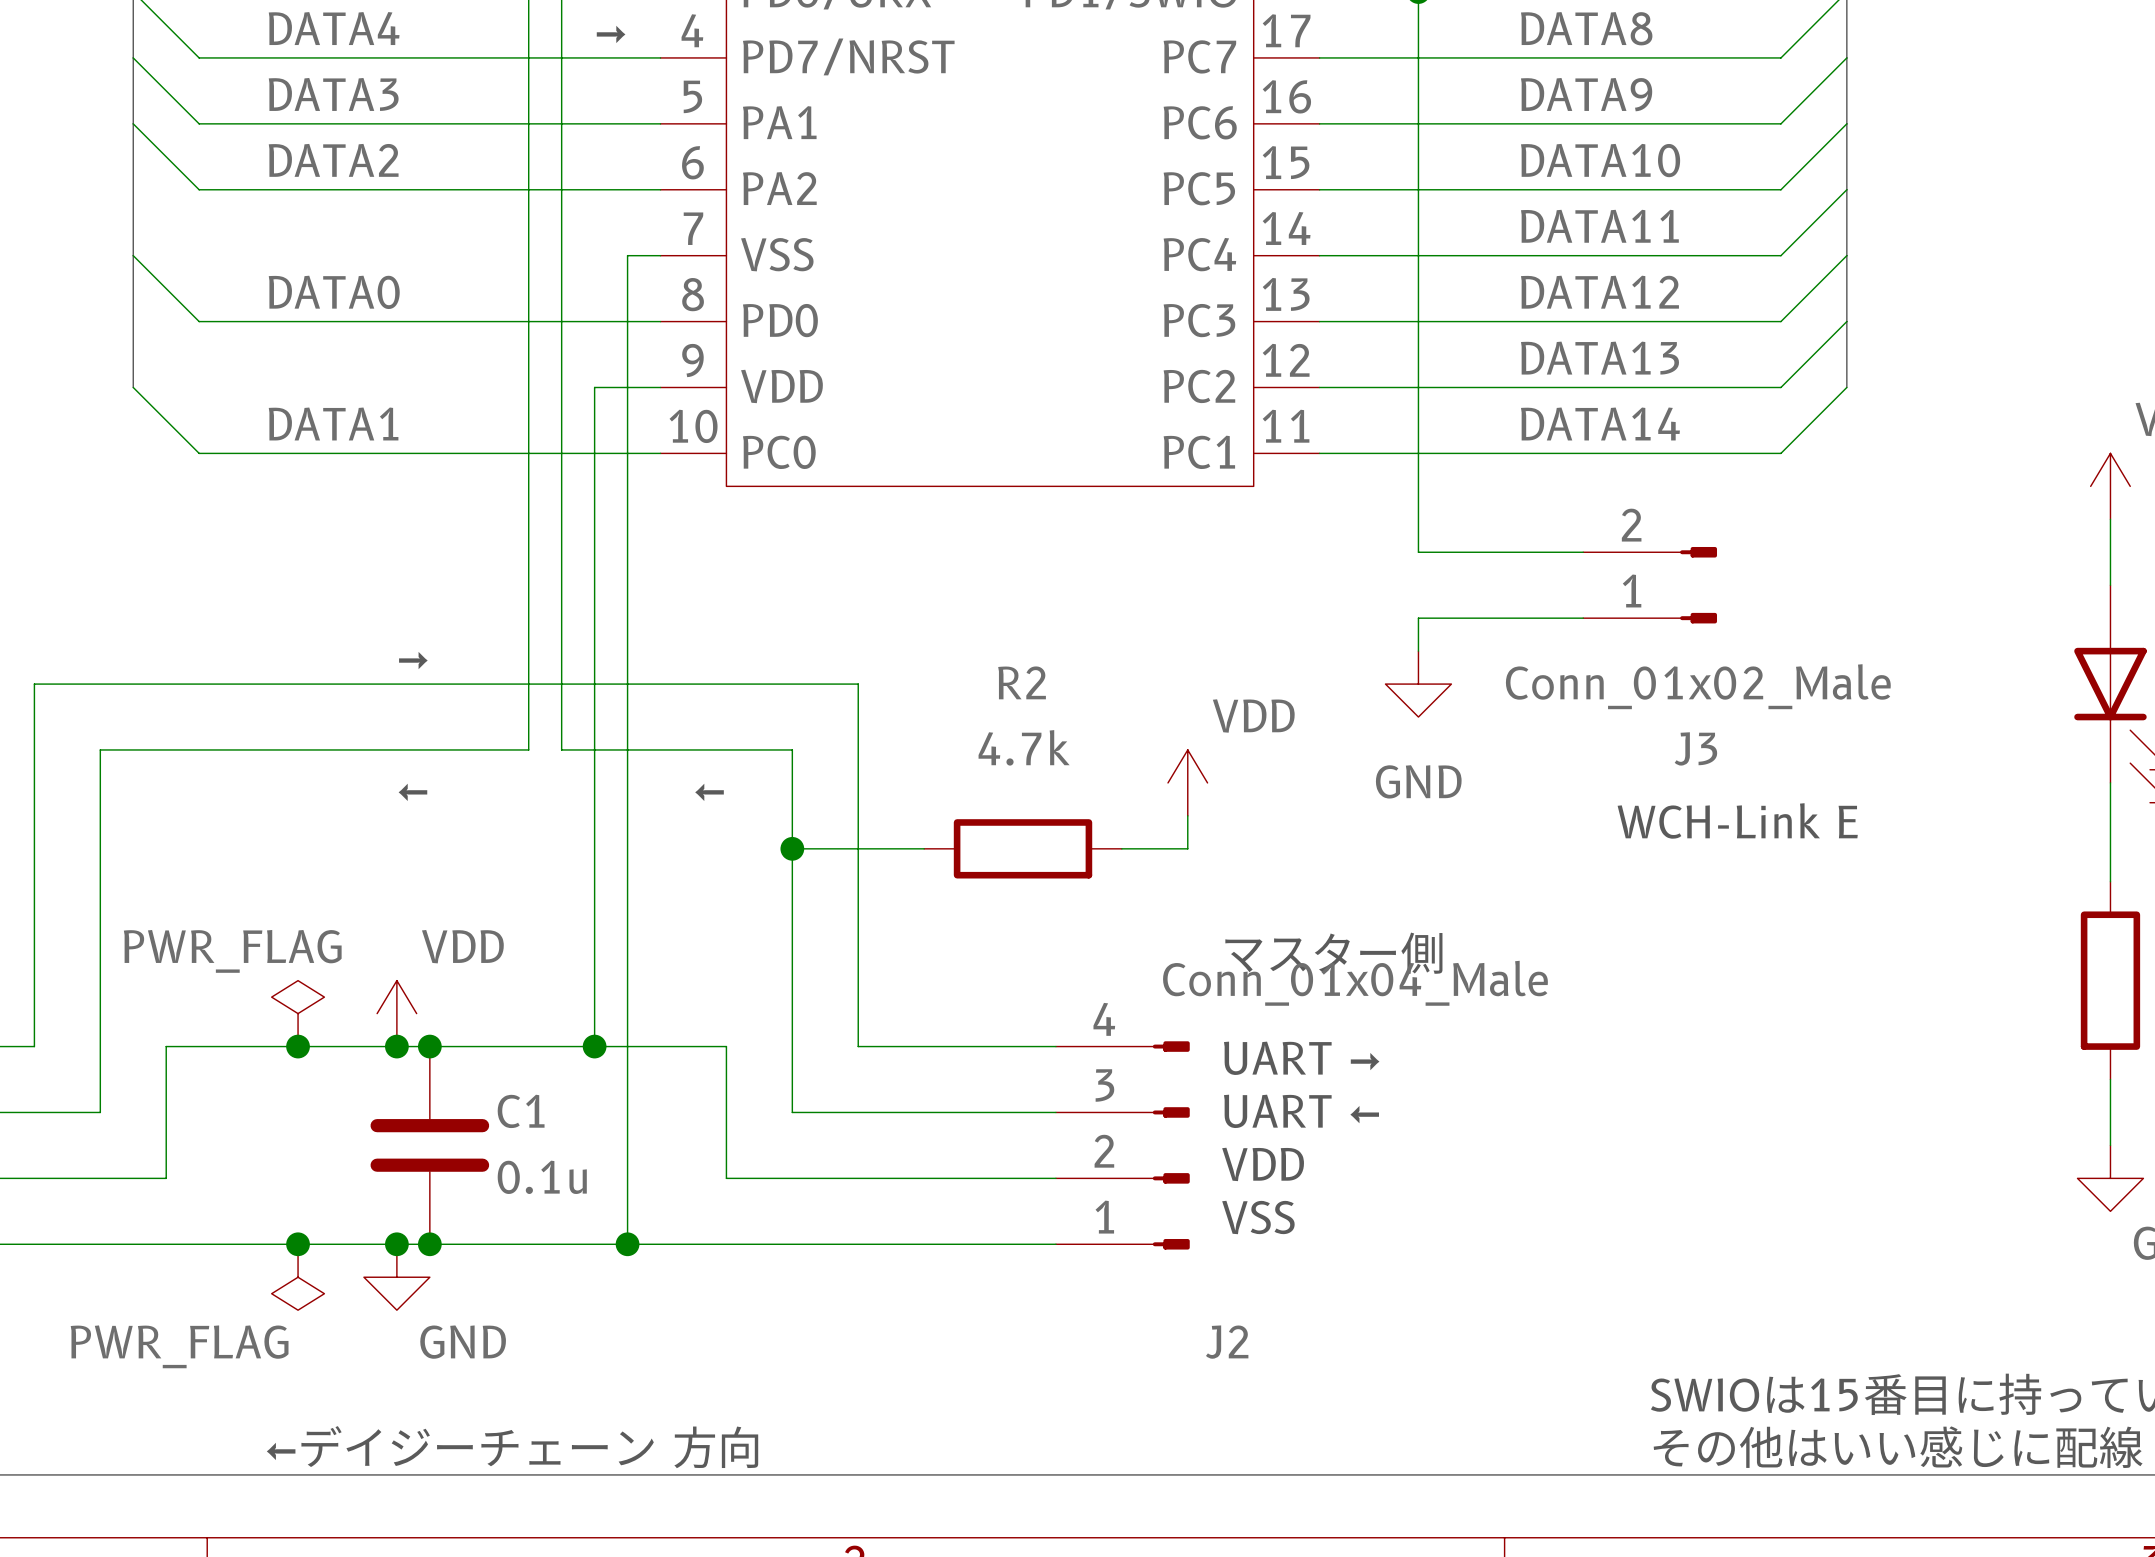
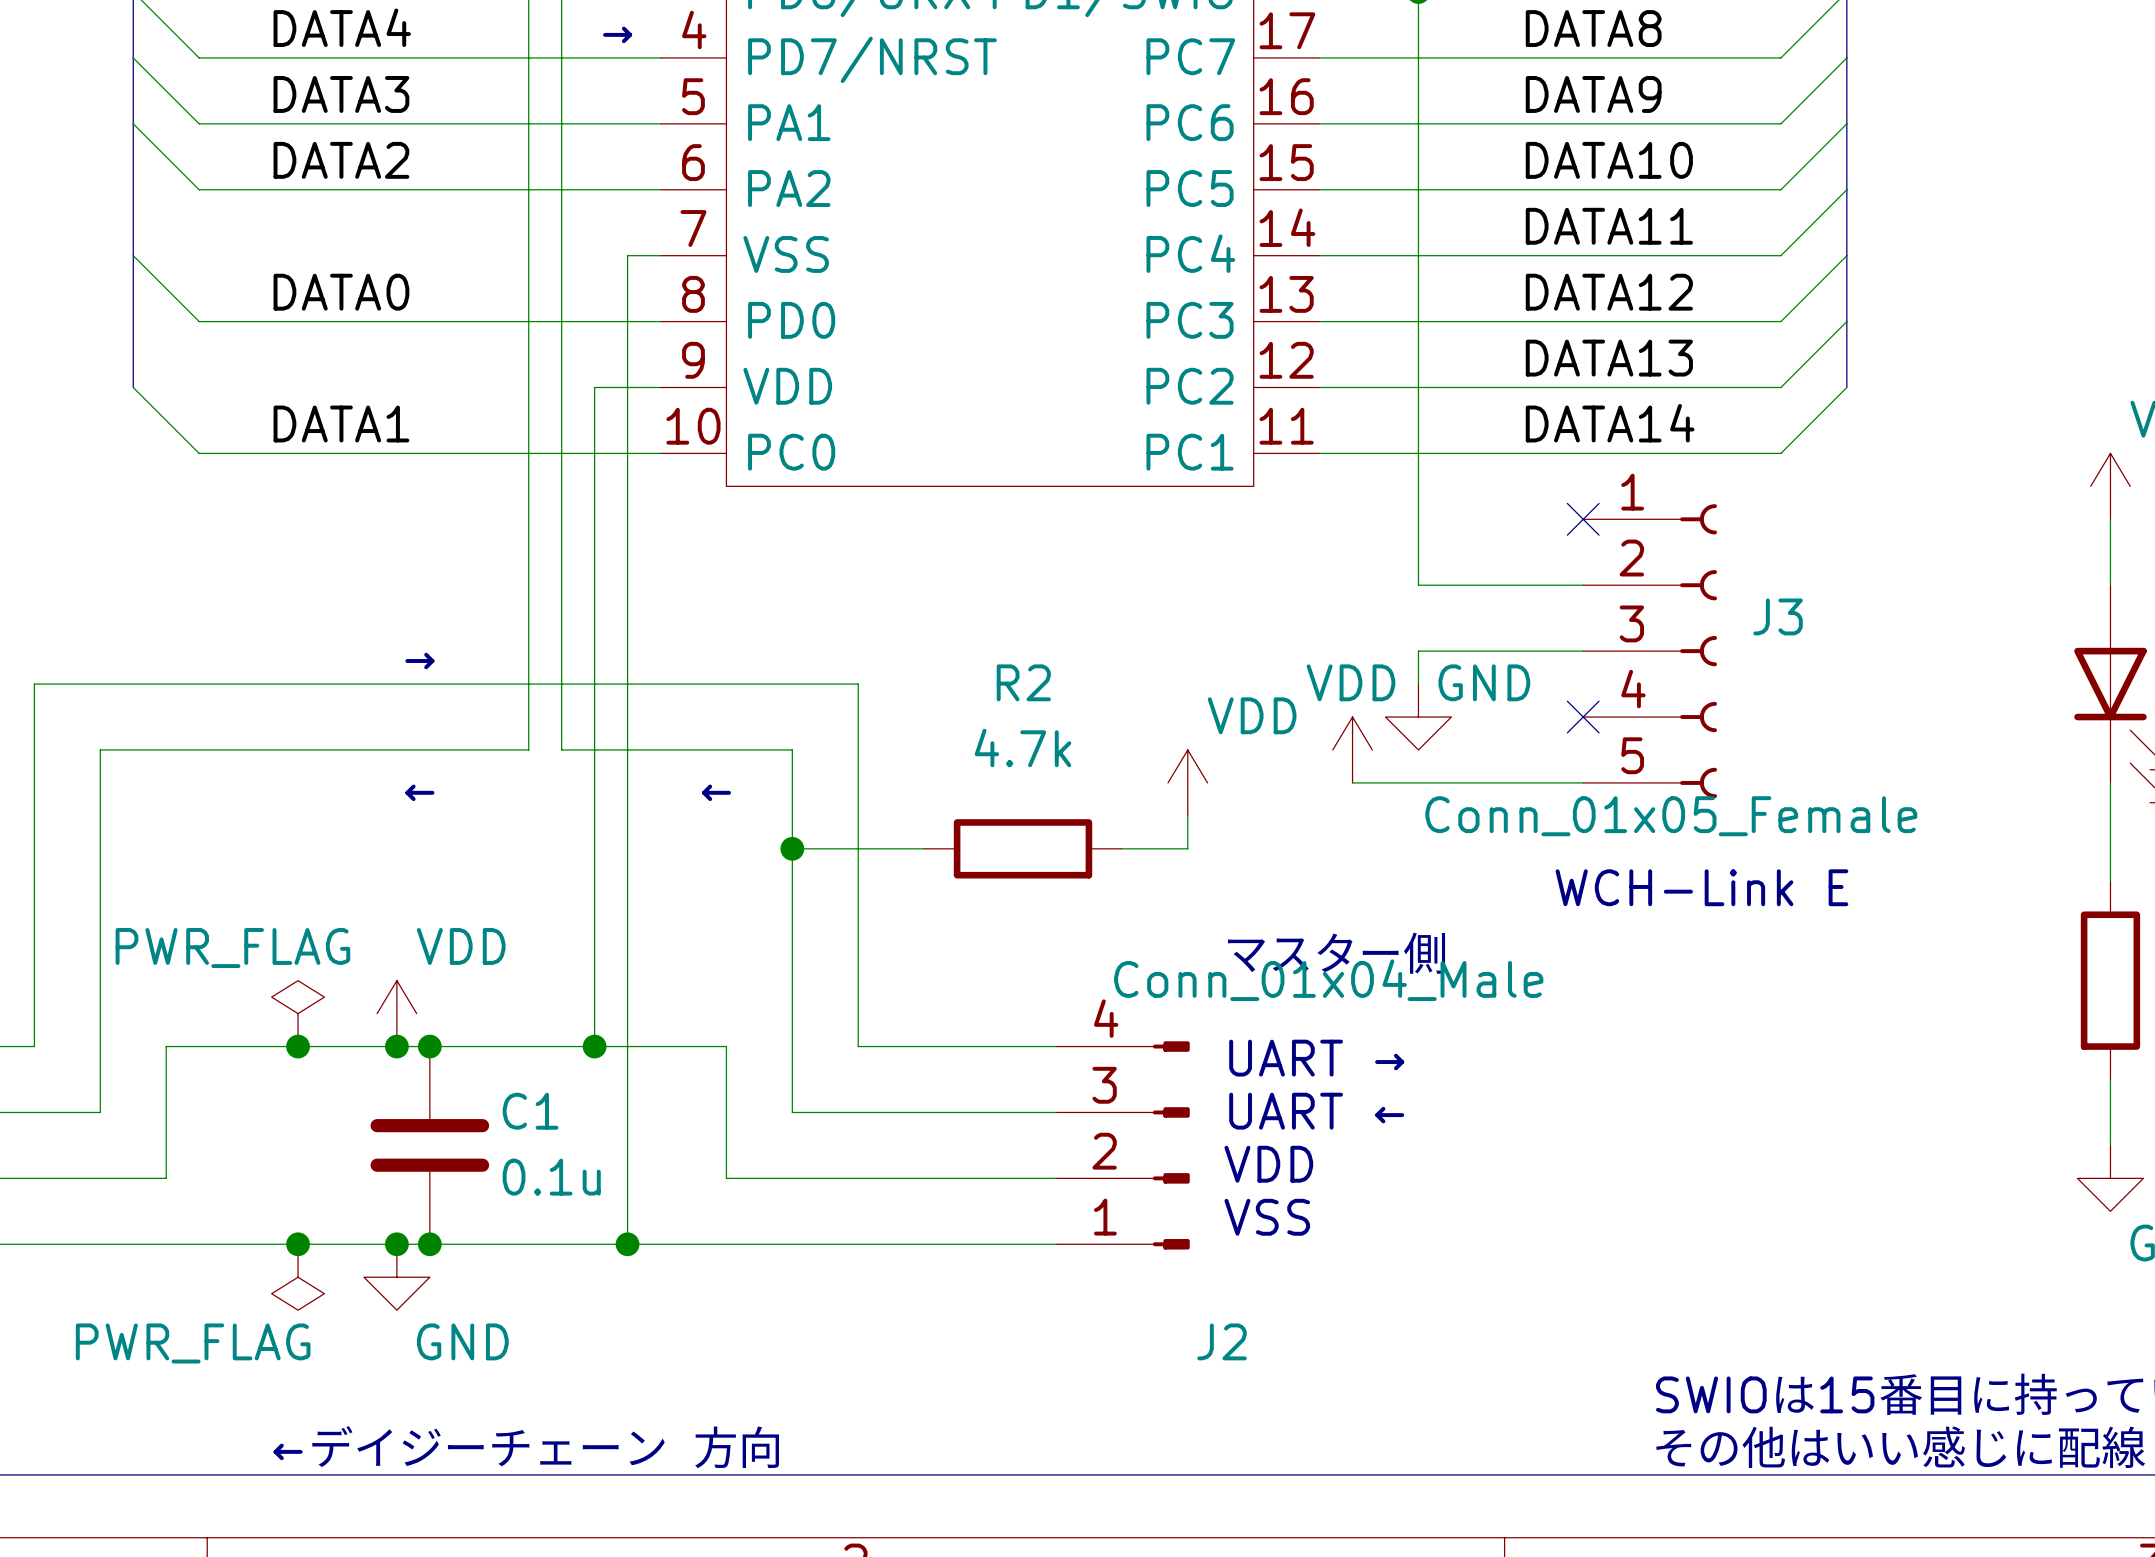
no-connect mark: none -> (1583, 519)
J3 symbol: [1583, 546, 1718, 624] -> [1583, 504, 1718, 799]
wire: (1418, 552) (1583, 552) -> (1418, 552) (1418, 585) (1583, 585)
wire: (1583, 618) (1418, 618) (1418, 651) -> (1583, 651) (1418, 651) (1418, 684)
power symbol position: GND (1418, 684) -> GND (1418, 717)
J3 value: Conn_01x02_Male (1698, 686) -> Conn_01x05_Female (1671, 816)
no-connect mark: none -> (1583, 717)
J3 name position: J3 (1695, 748) -> J3 (1778, 616)
power symbol: none -> VDD (1352, 749)
power symbol text position: GND (1418, 781) -> GND (1484, 682)
wire: none -> (1352, 782) (1583, 782)
text position: WCH-Link E (1737, 820) -> WCH-Link E (1701, 887)

